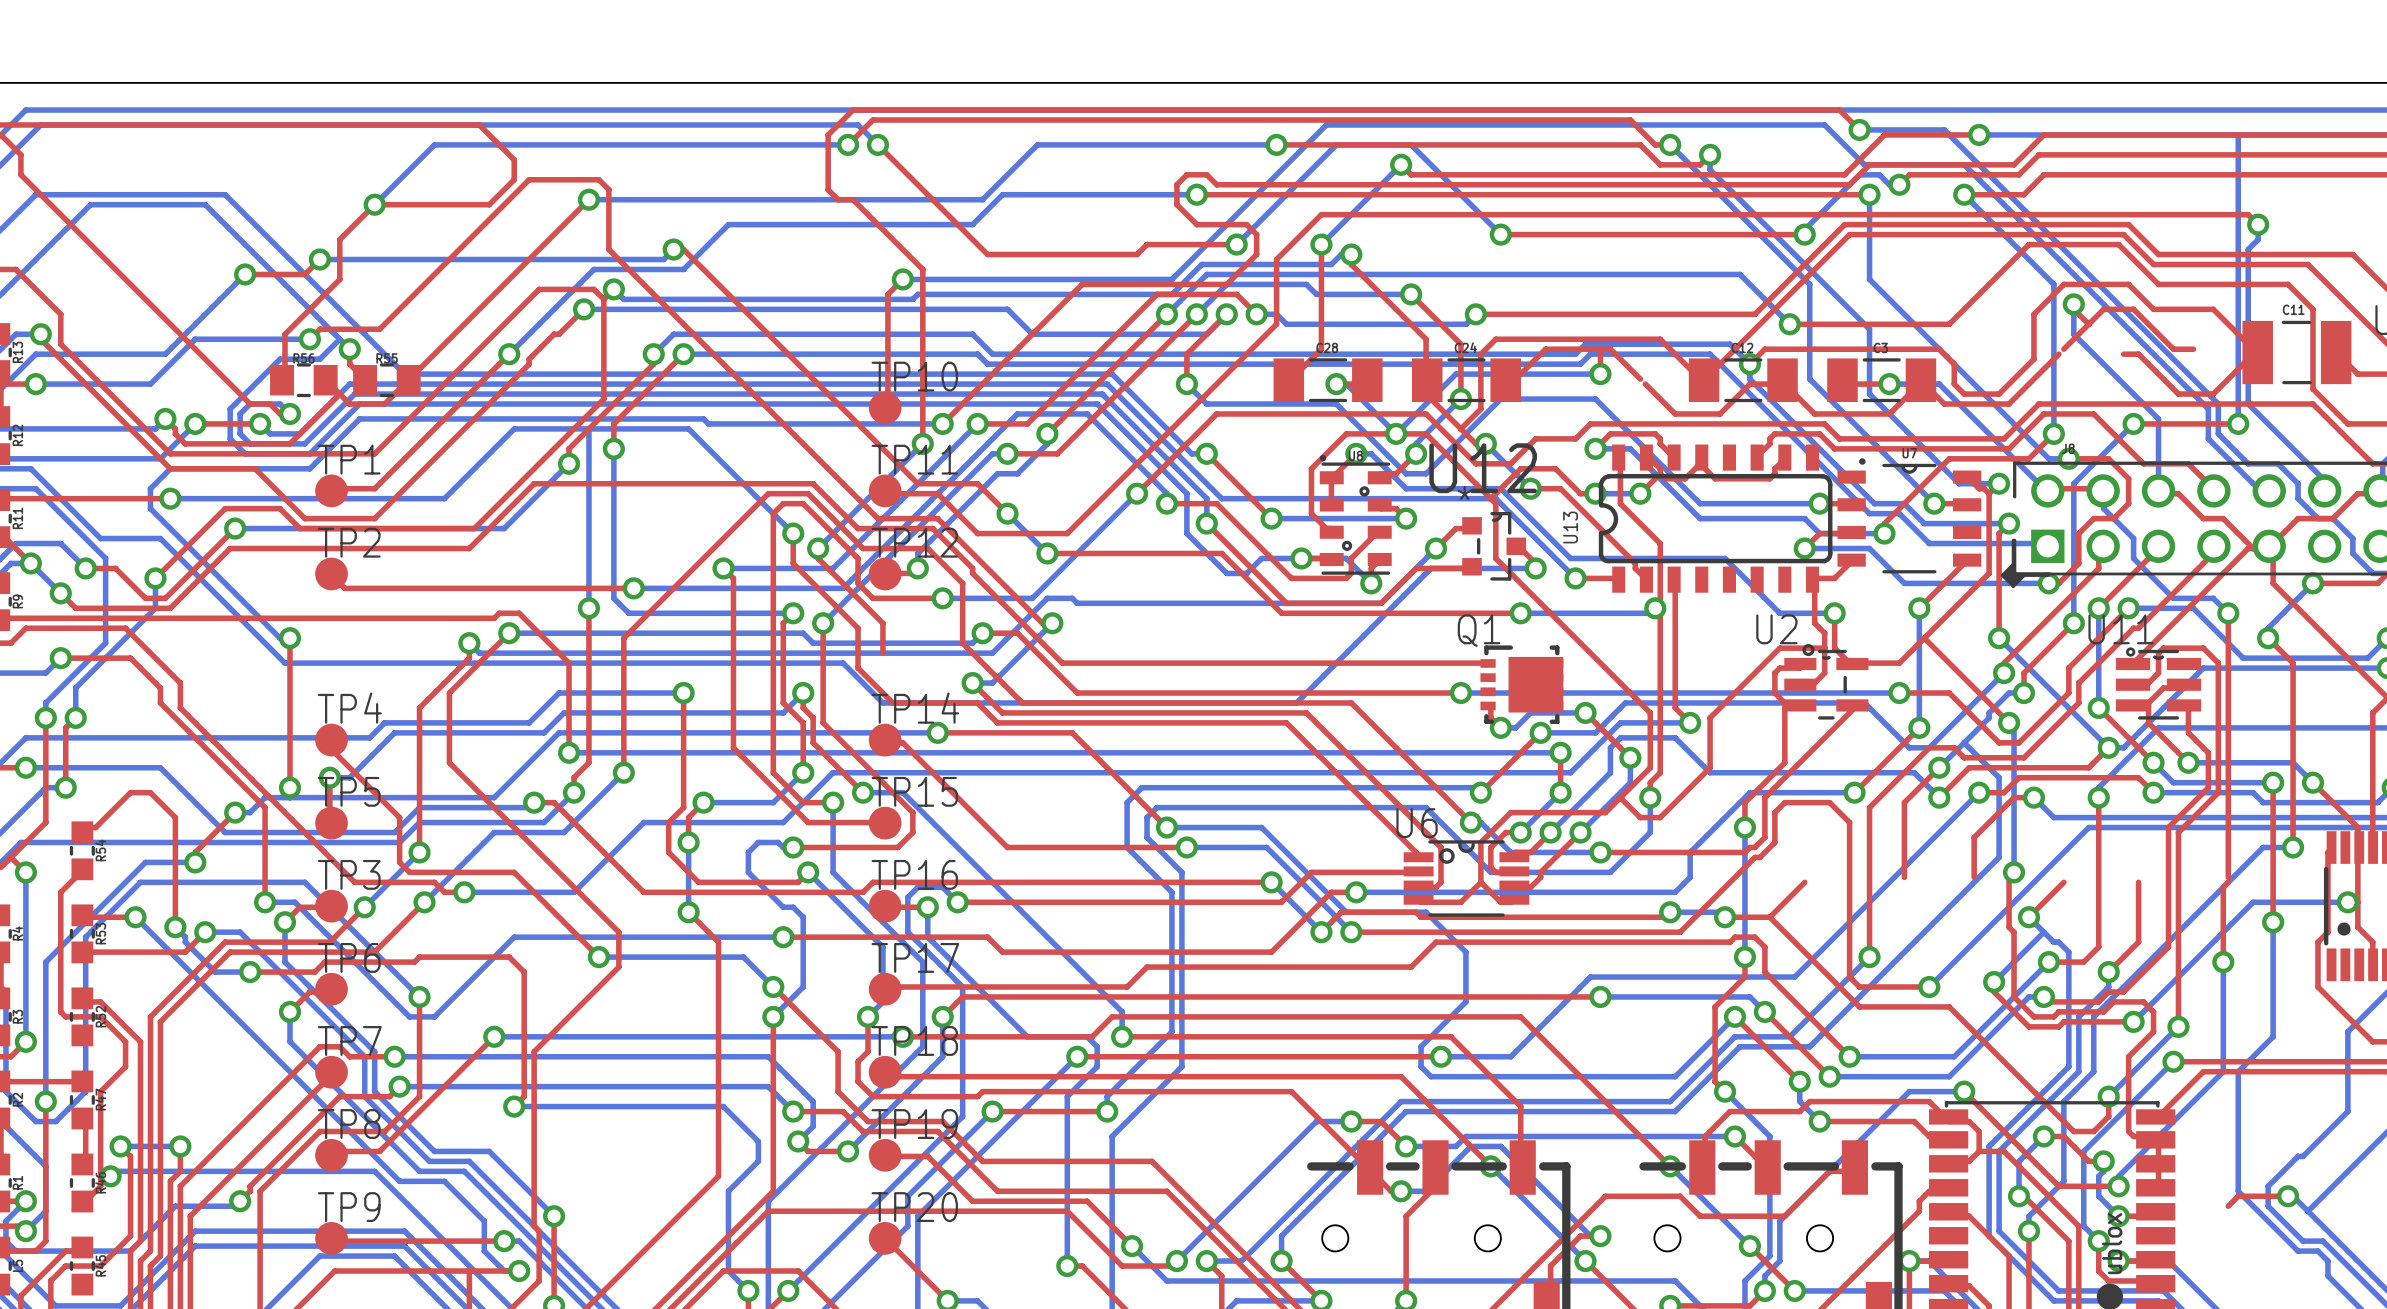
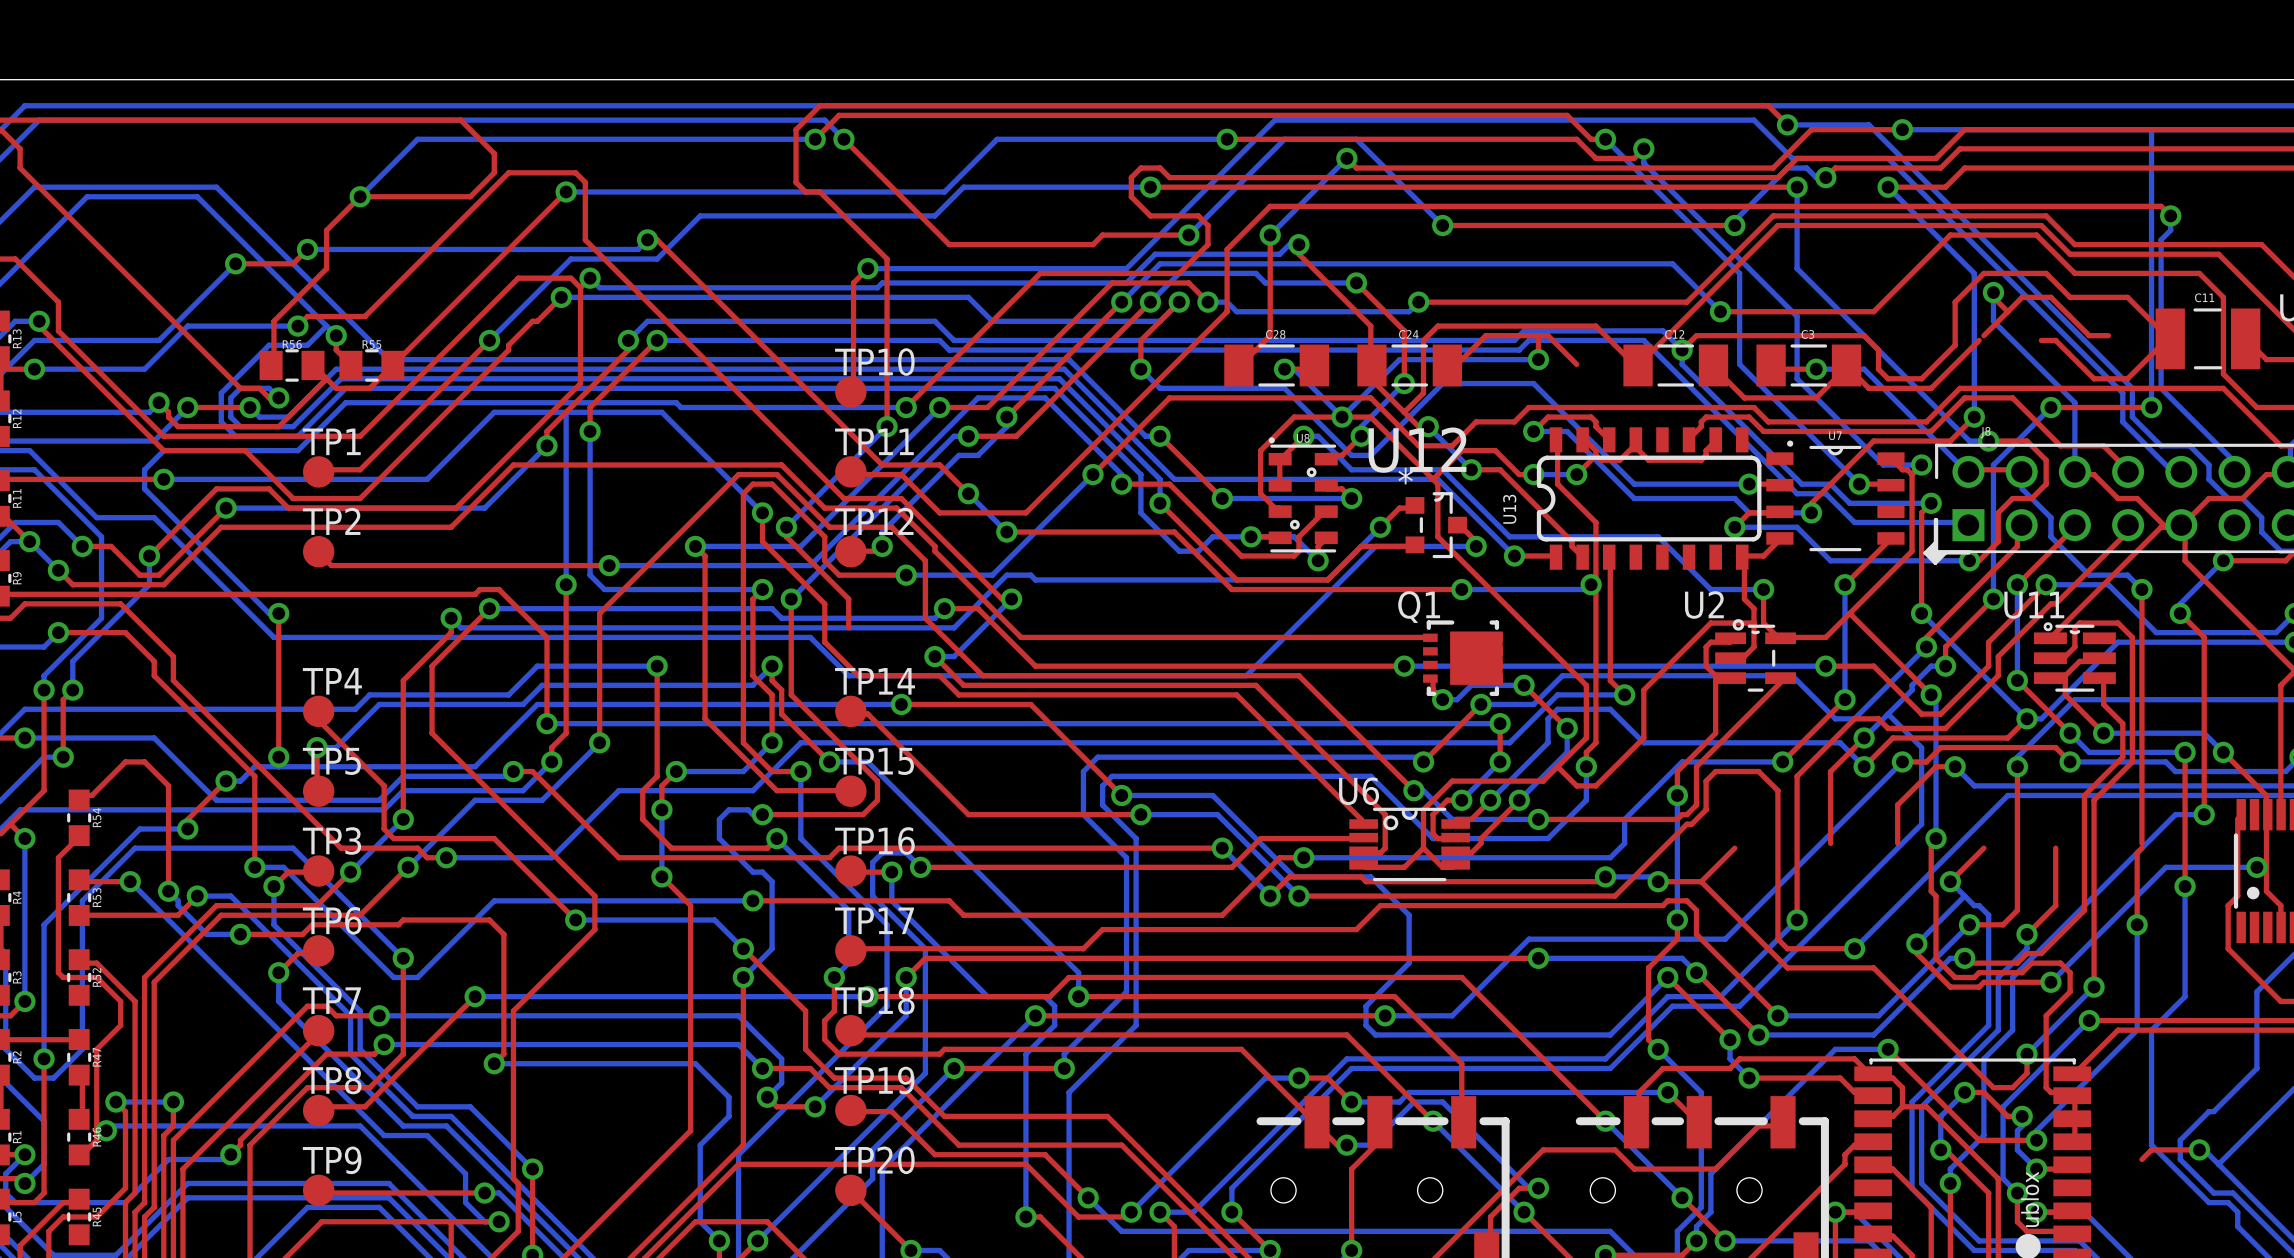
top track: (1645, 384) (1675, 413) (1720, 413) (1749, 384) (1779, 384) (1782, 380) (1784, 384) -> none

